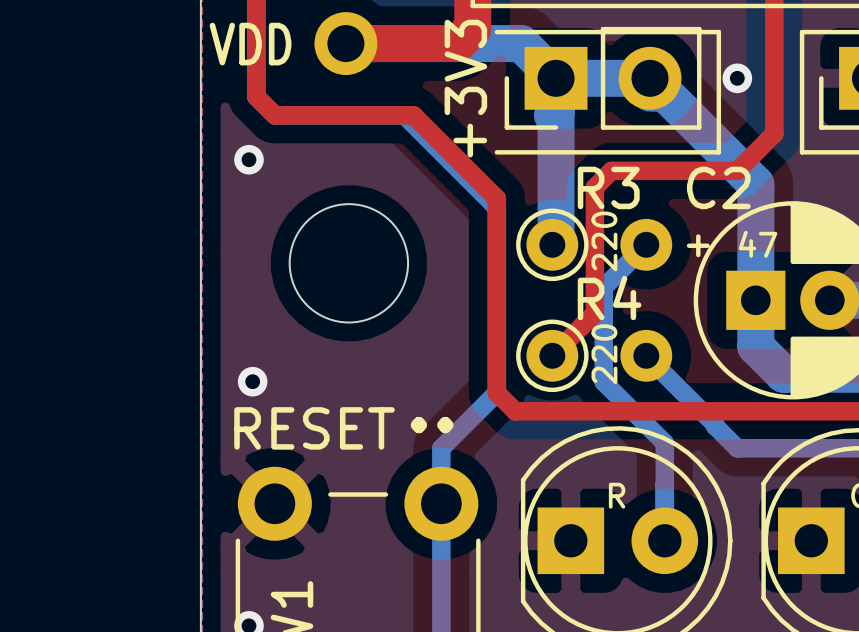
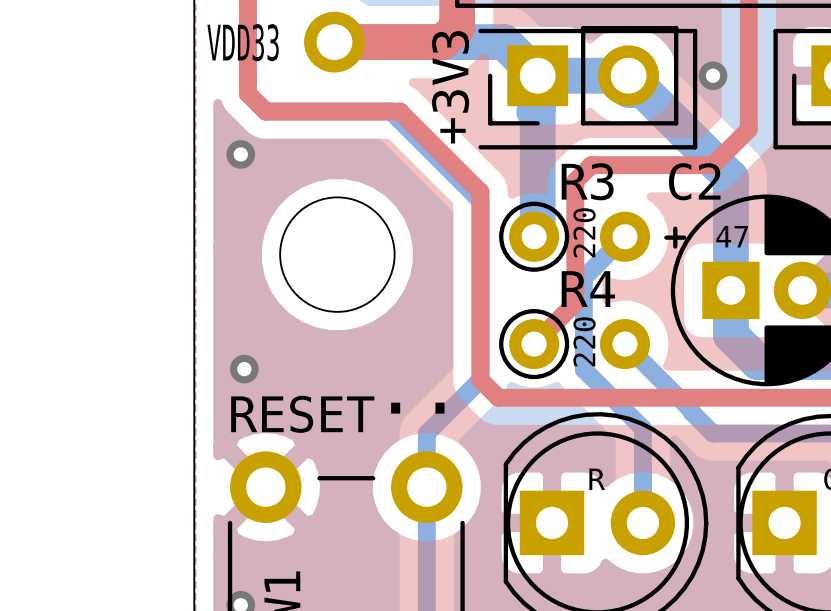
text: VDD (250, 44) -> VDD33 (243, 42)

